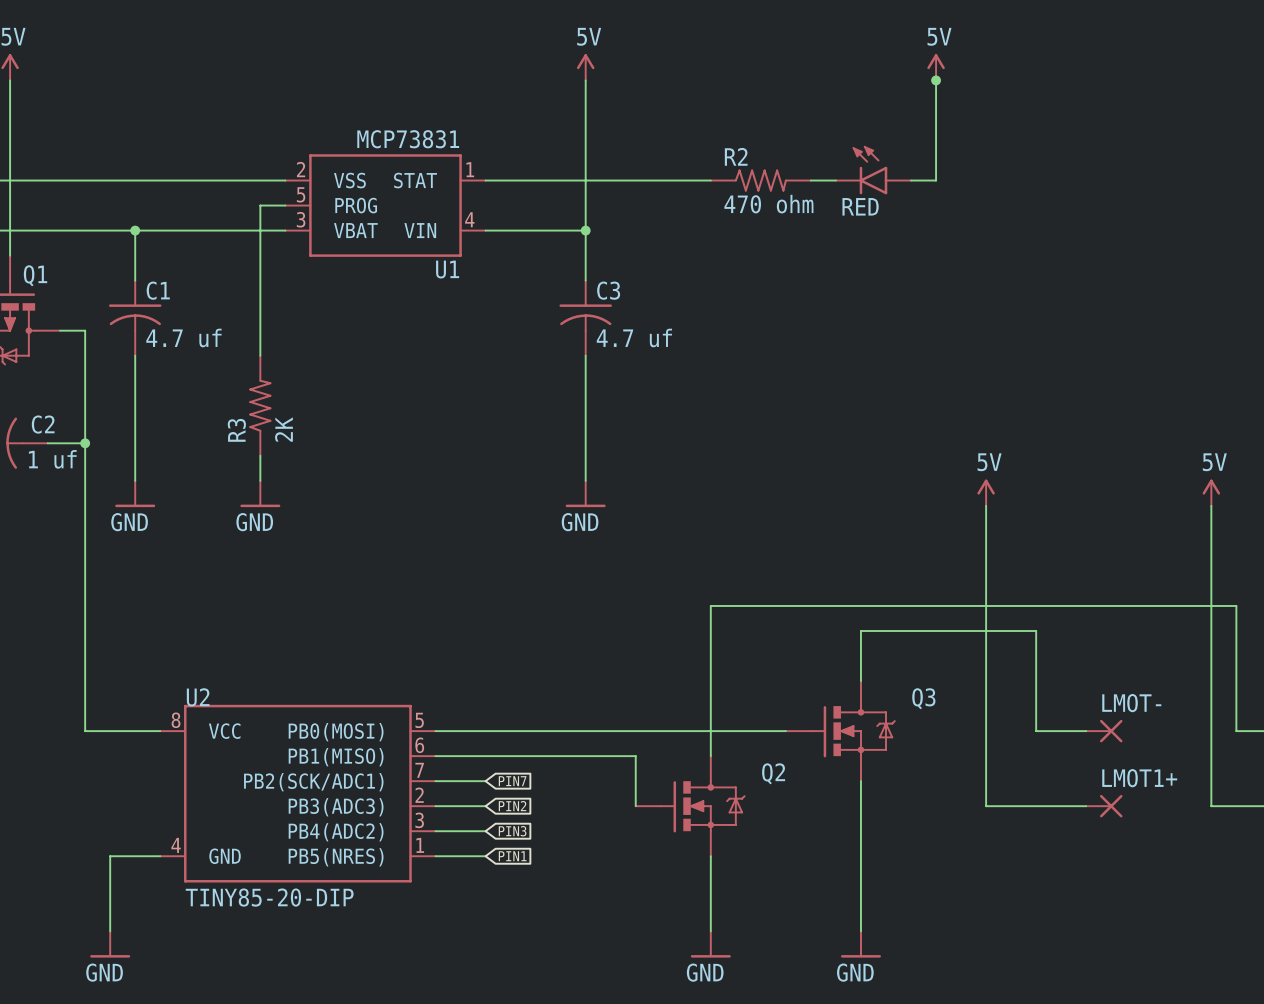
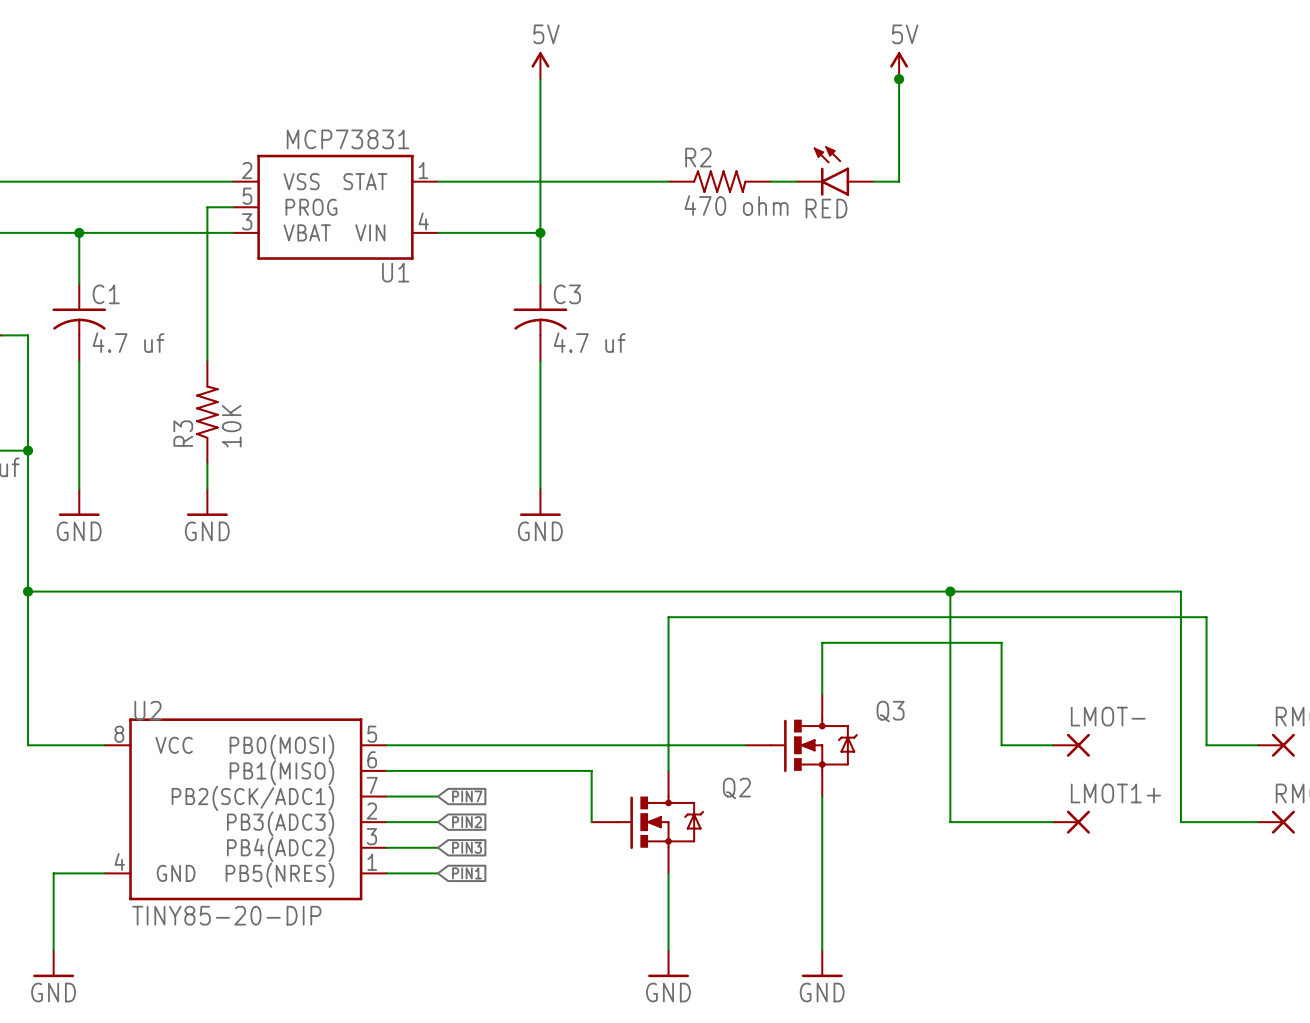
R3 value: 2K (283, 429) -> 10K (231, 426)
power symbol: 5V (986, 492) -> none
power symbol: 5V (1211, 492) -> none
wire: (986, 505) (986, 580) -> none
wire: (1211, 505) (1211, 580) -> (28, 591) (1180, 591)
junction: none -> (28, 591)
junction: none -> (950, 591)

